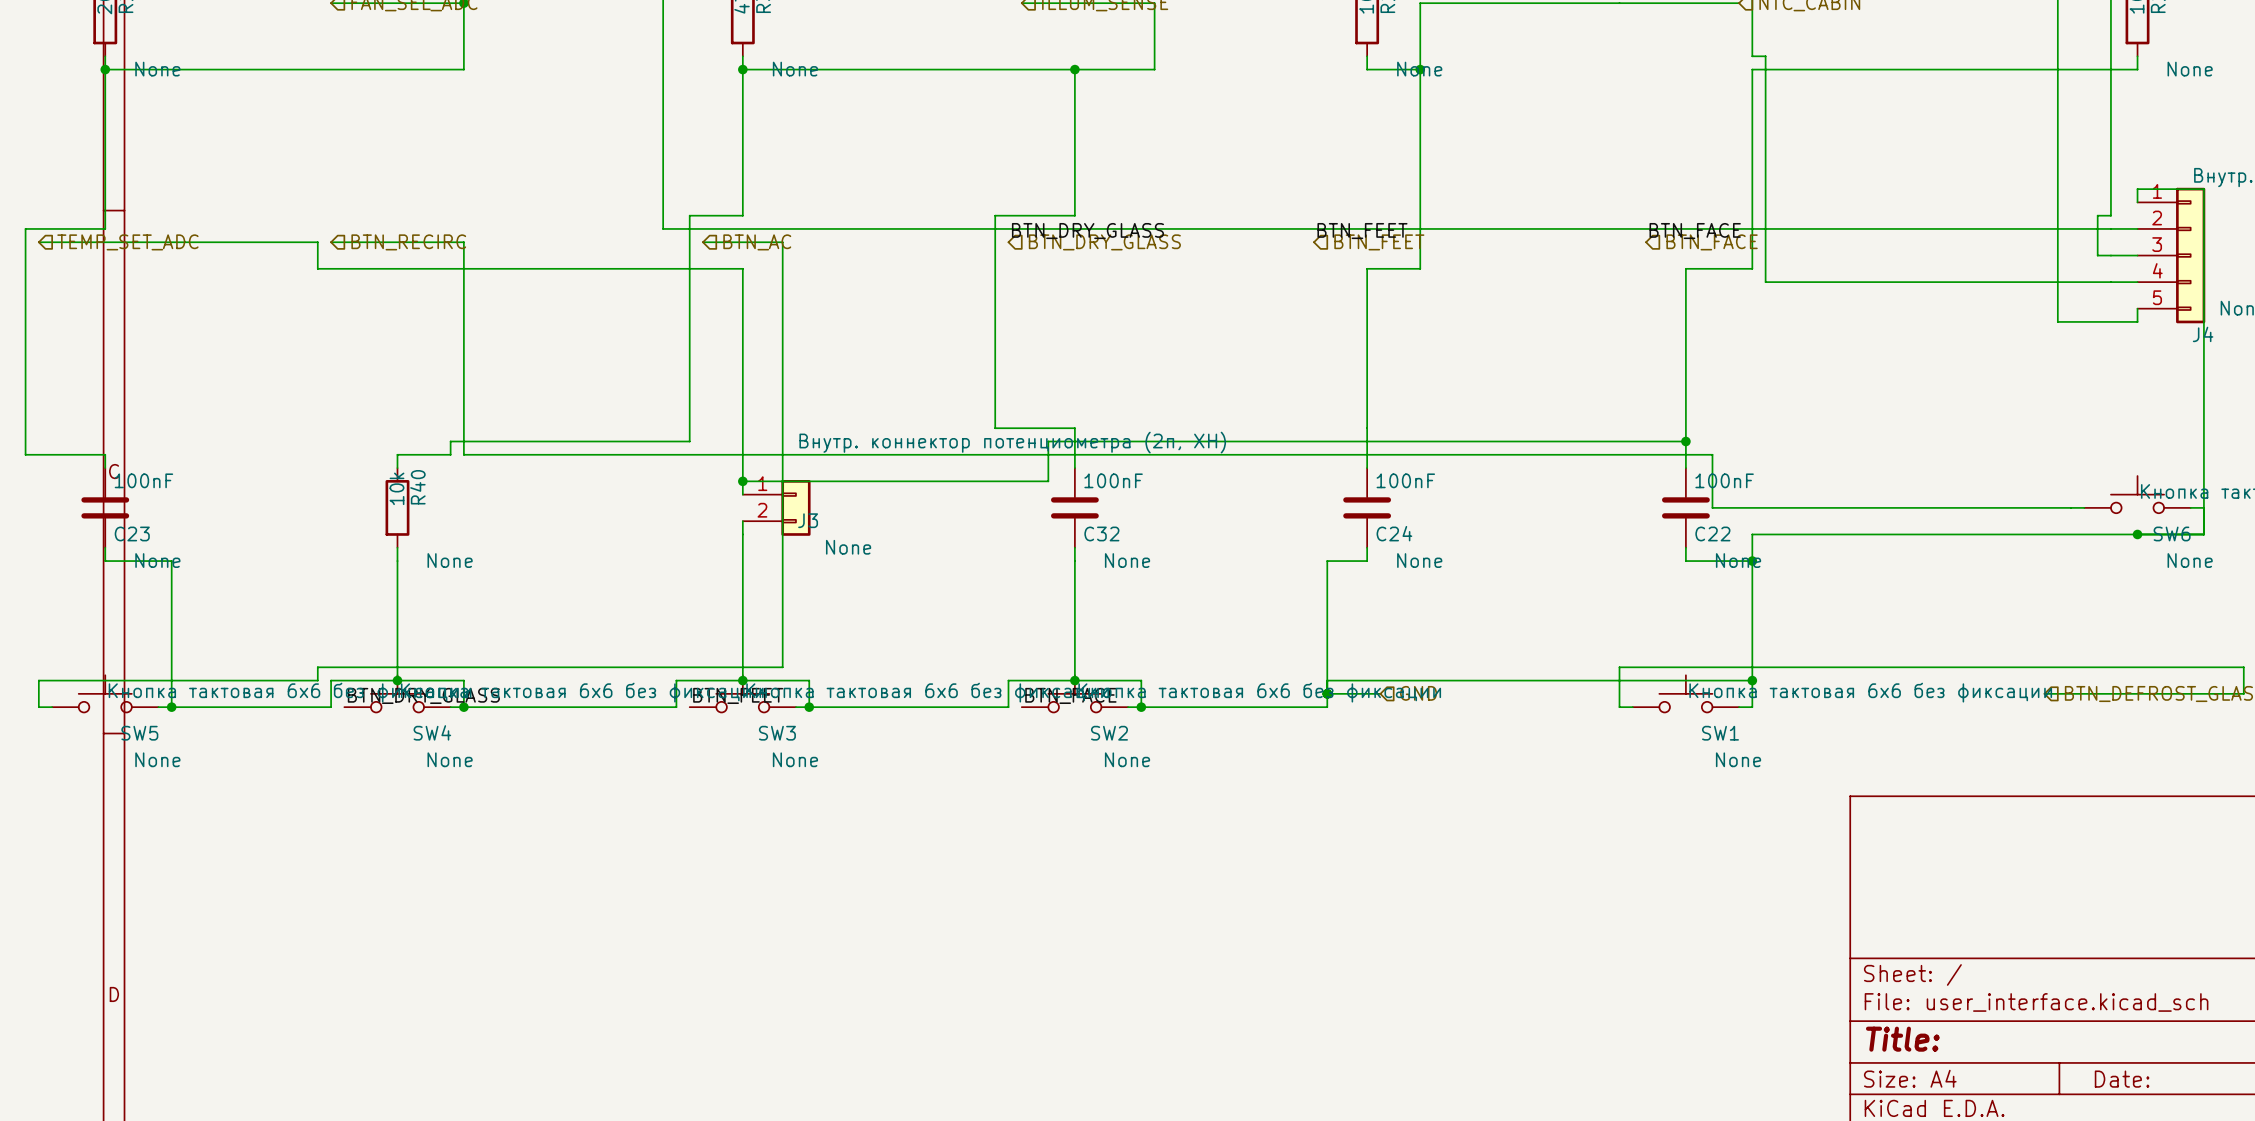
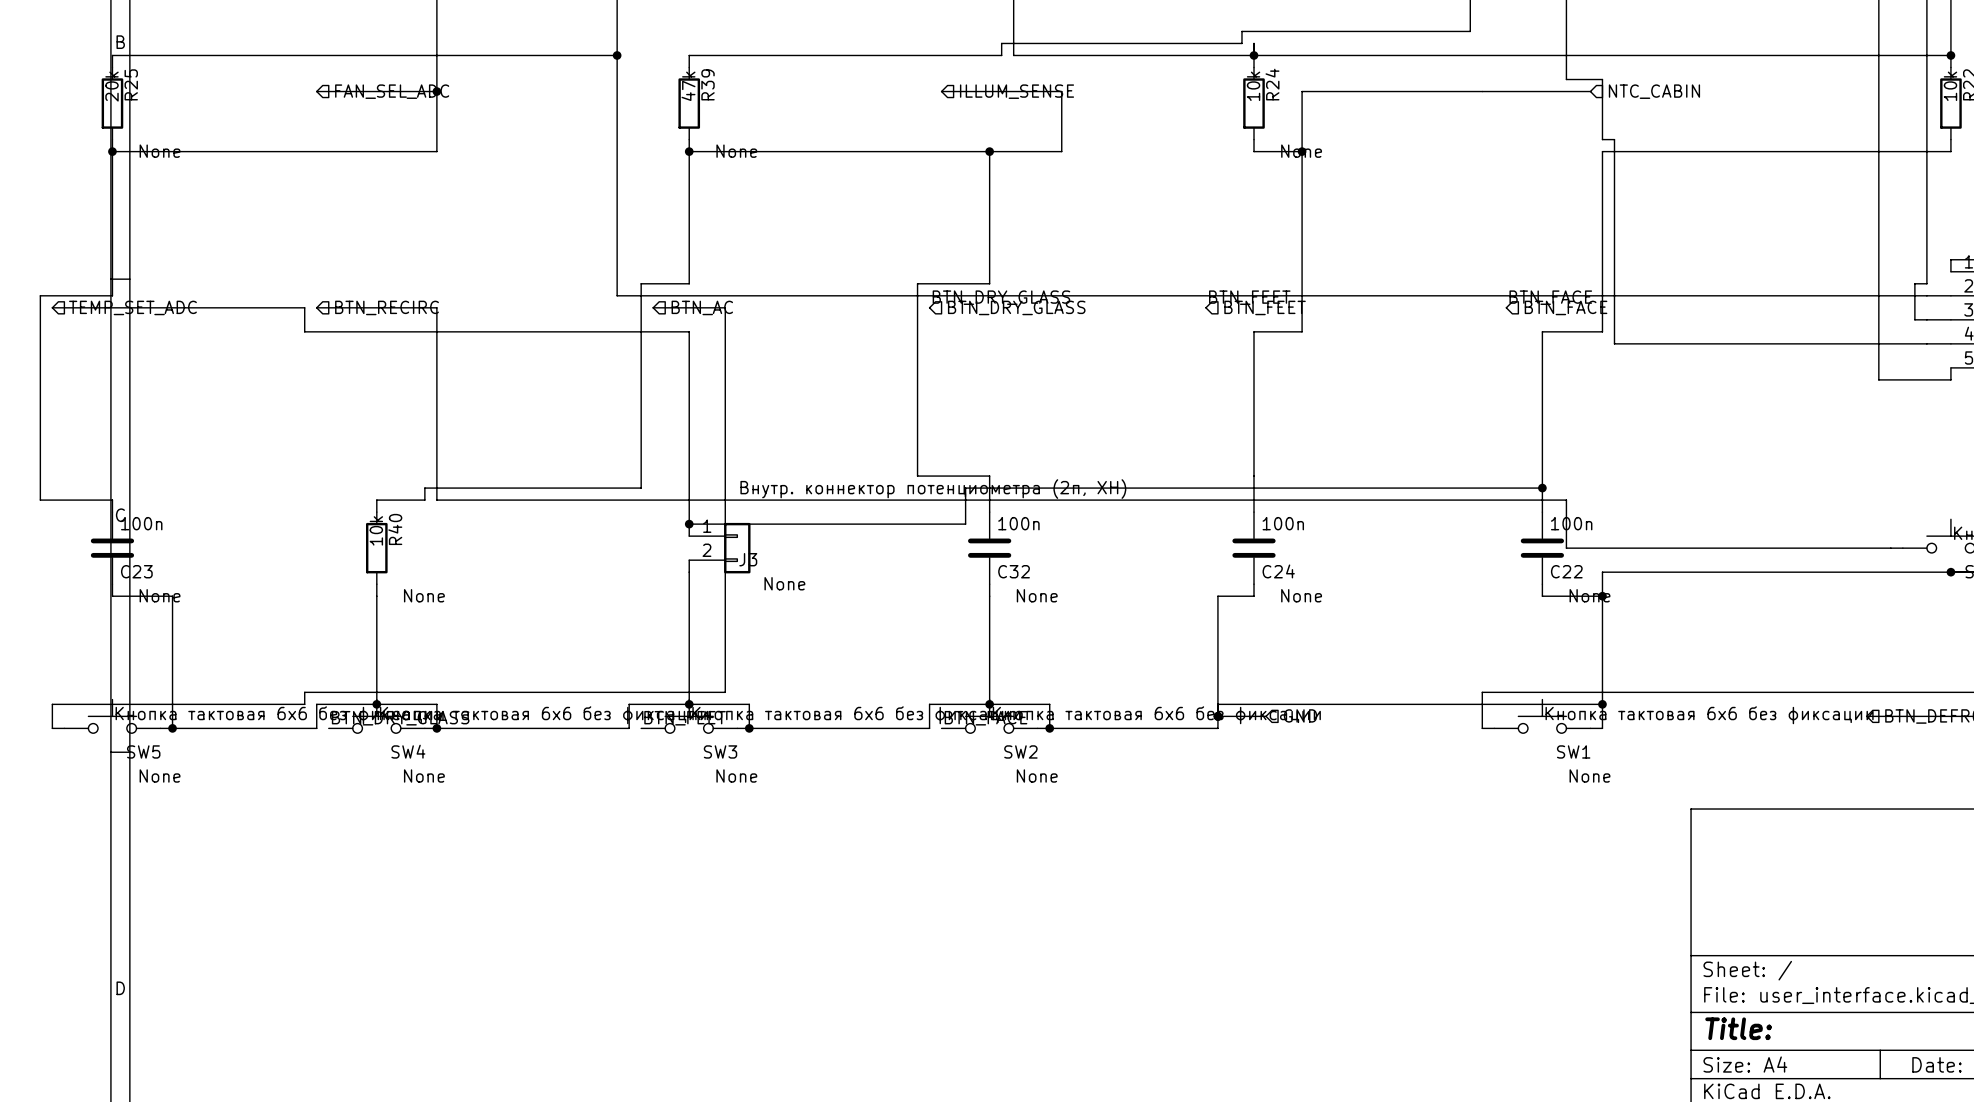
C23 value: 100nF (143, 480) -> 100n (141, 523)
C32 value: 100nF (1113, 480) -> 100n (1018, 523)
C24 value: 100nF (1405, 480) -> 100n (1283, 523)
C22 value: 100nF (1724, 480) -> 100n (1571, 523)

